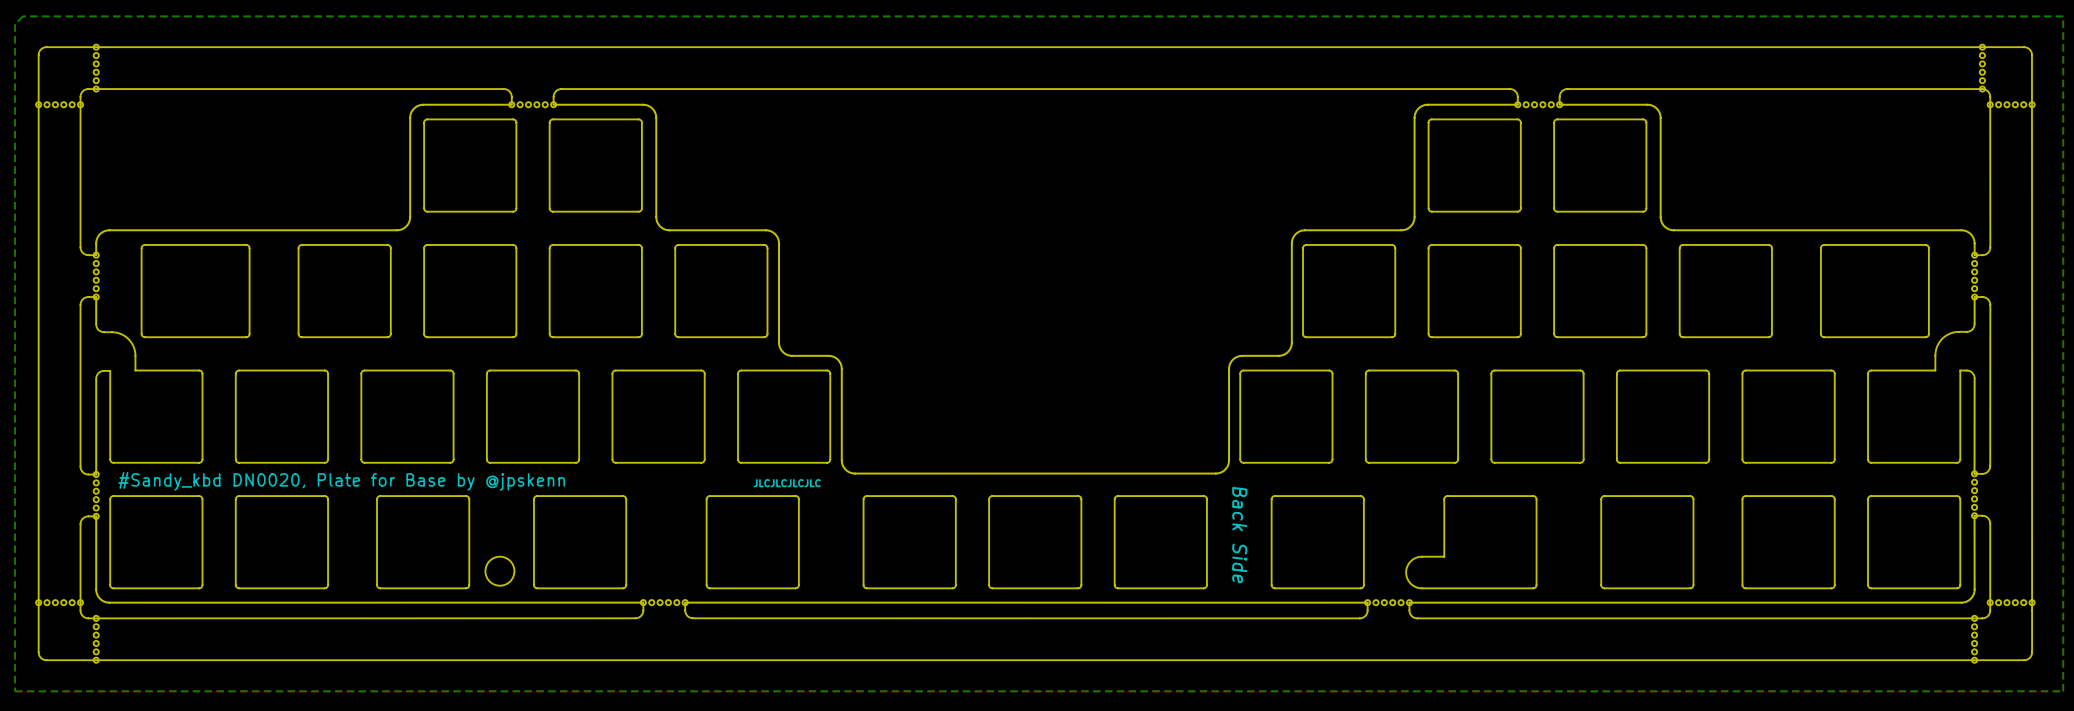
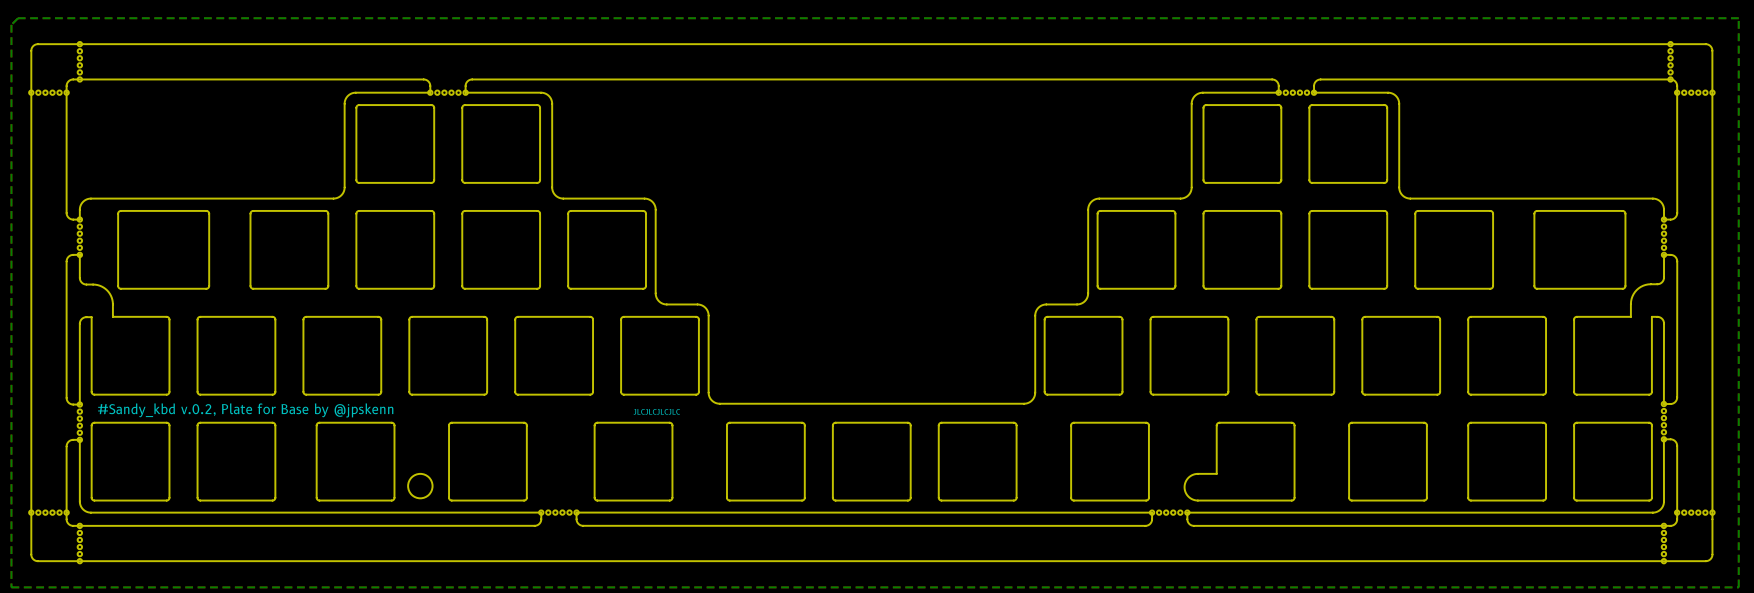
text: #Sandy_kbd DN0020, Plate for Base by @jpskenn (341, 481) -> #Sandy_kbd v.0.2, Plate for Base by @jpskenn (245, 410)
text: Back Side (1239, 535) -> none

